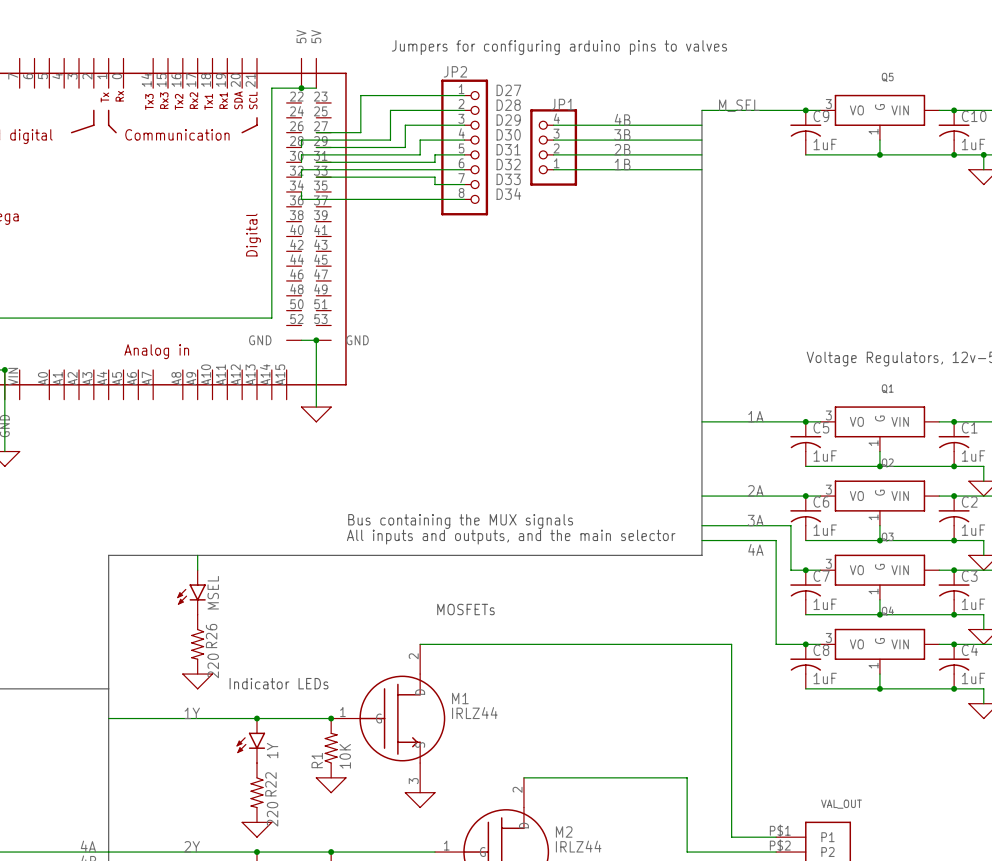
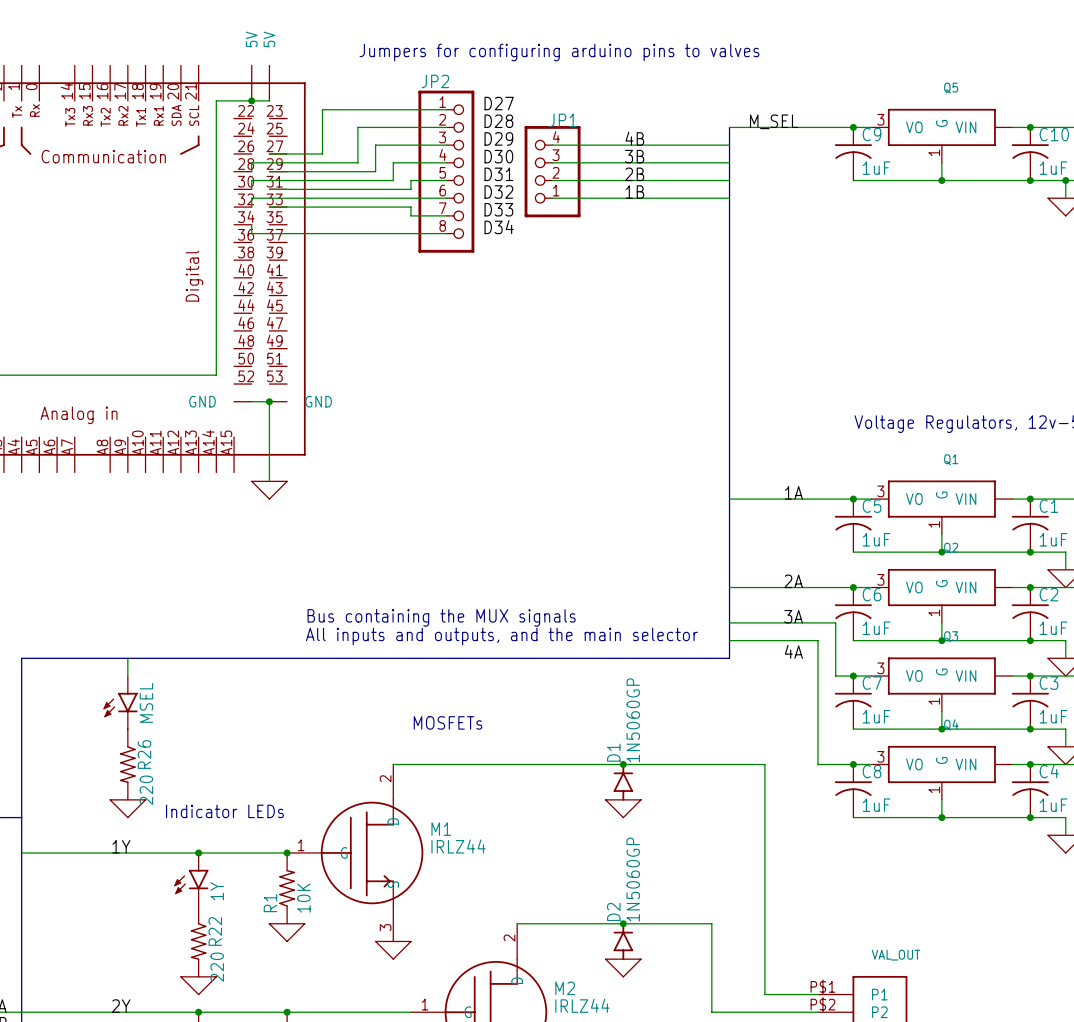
junction: none -> (623, 764)
D1: none -> 1N5060GP (623, 782)
power symbol: none -> (623, 808)
junction: none -> (623, 923)
D2: none -> 1N5060GP (623, 941)
power symbol: none -> (623, 968)

